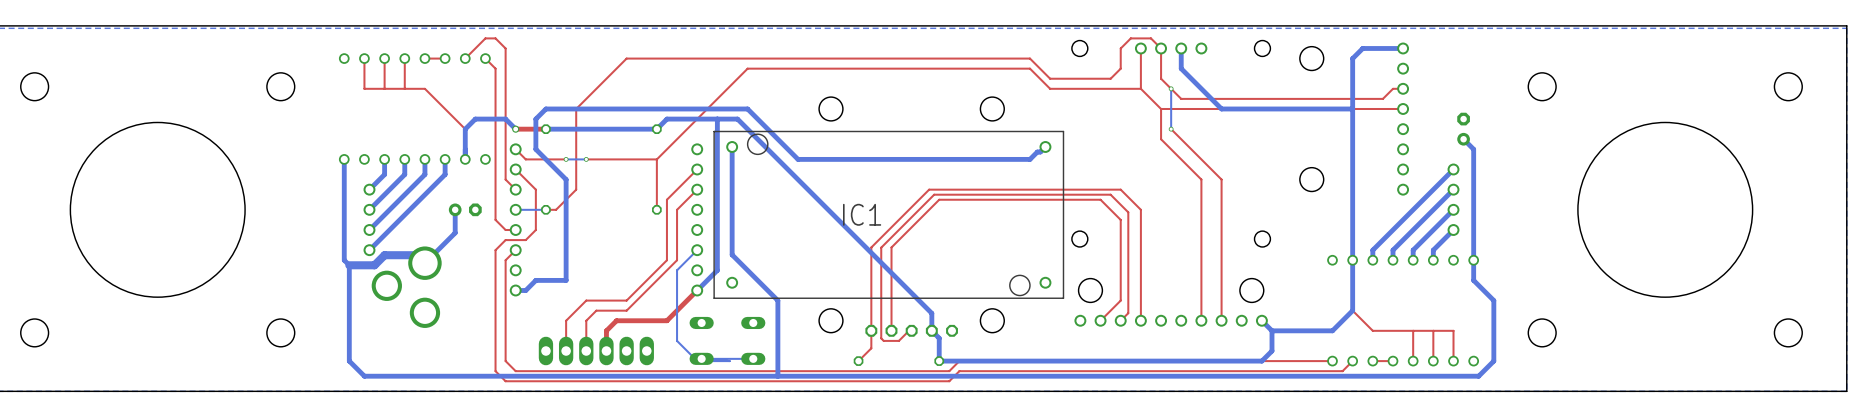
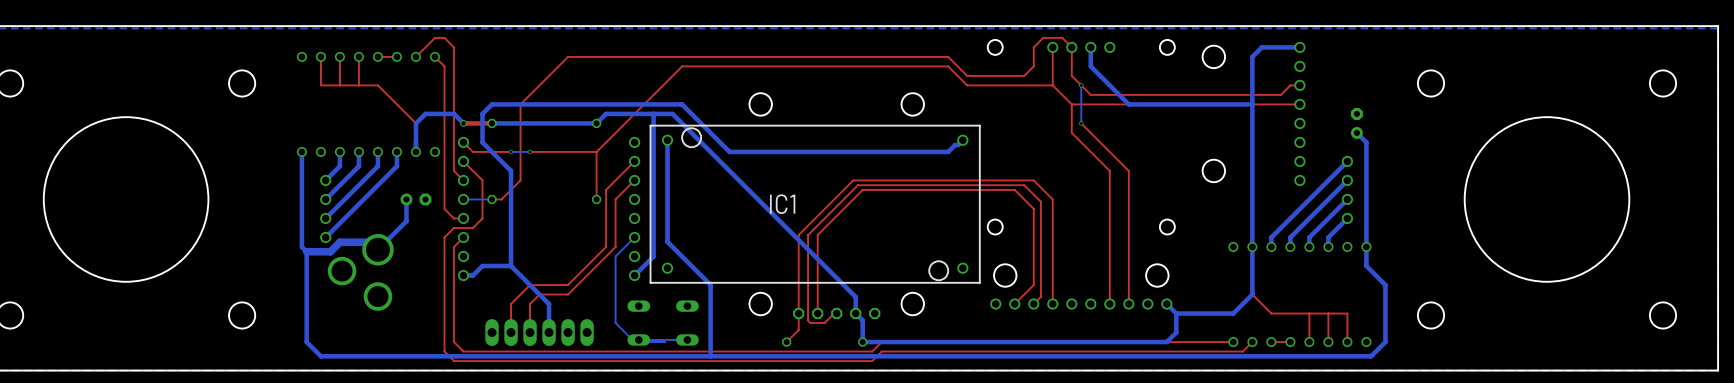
bottom track: none -> (511, 266) (549, 304) (549, 332)
top track: (697, 290) (666, 320) (616, 320) (606, 330) (606, 351) -> none

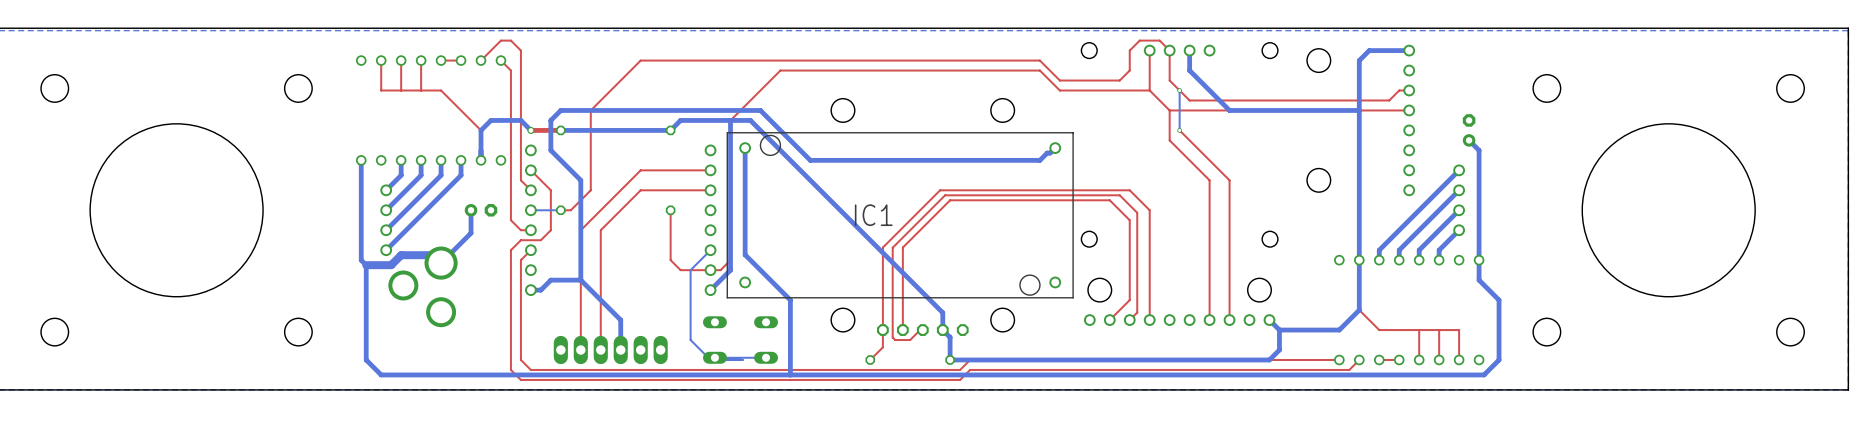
top track: (701, 66) (682, 66) (596, 151) -> (780, 70) (730, 120) (730, 260) (720, 270) (680, 270) (670, 260) (670, 210)
top track: (463, 142) (473, 151) (511, 151) -> none
via: (511, 151) -> none
bottom track: (530, 151) (511, 151) -> none
via: (530, 151) -> none
top track: (596, 151) (596, 199) -> none
top track: (596, 151) (530, 151) -> none
top track: (634, 161) (606, 189) (606, 246) (568, 285) (530, 285) (511, 304) -> (710, 170) (640, 170) (580, 230) (580, 320)
top track: (634, 180) (615, 199) (615, 246) (568, 294) (539, 294) (530, 304) -> (710, 190) (640, 190) (600, 230) (600, 320)

